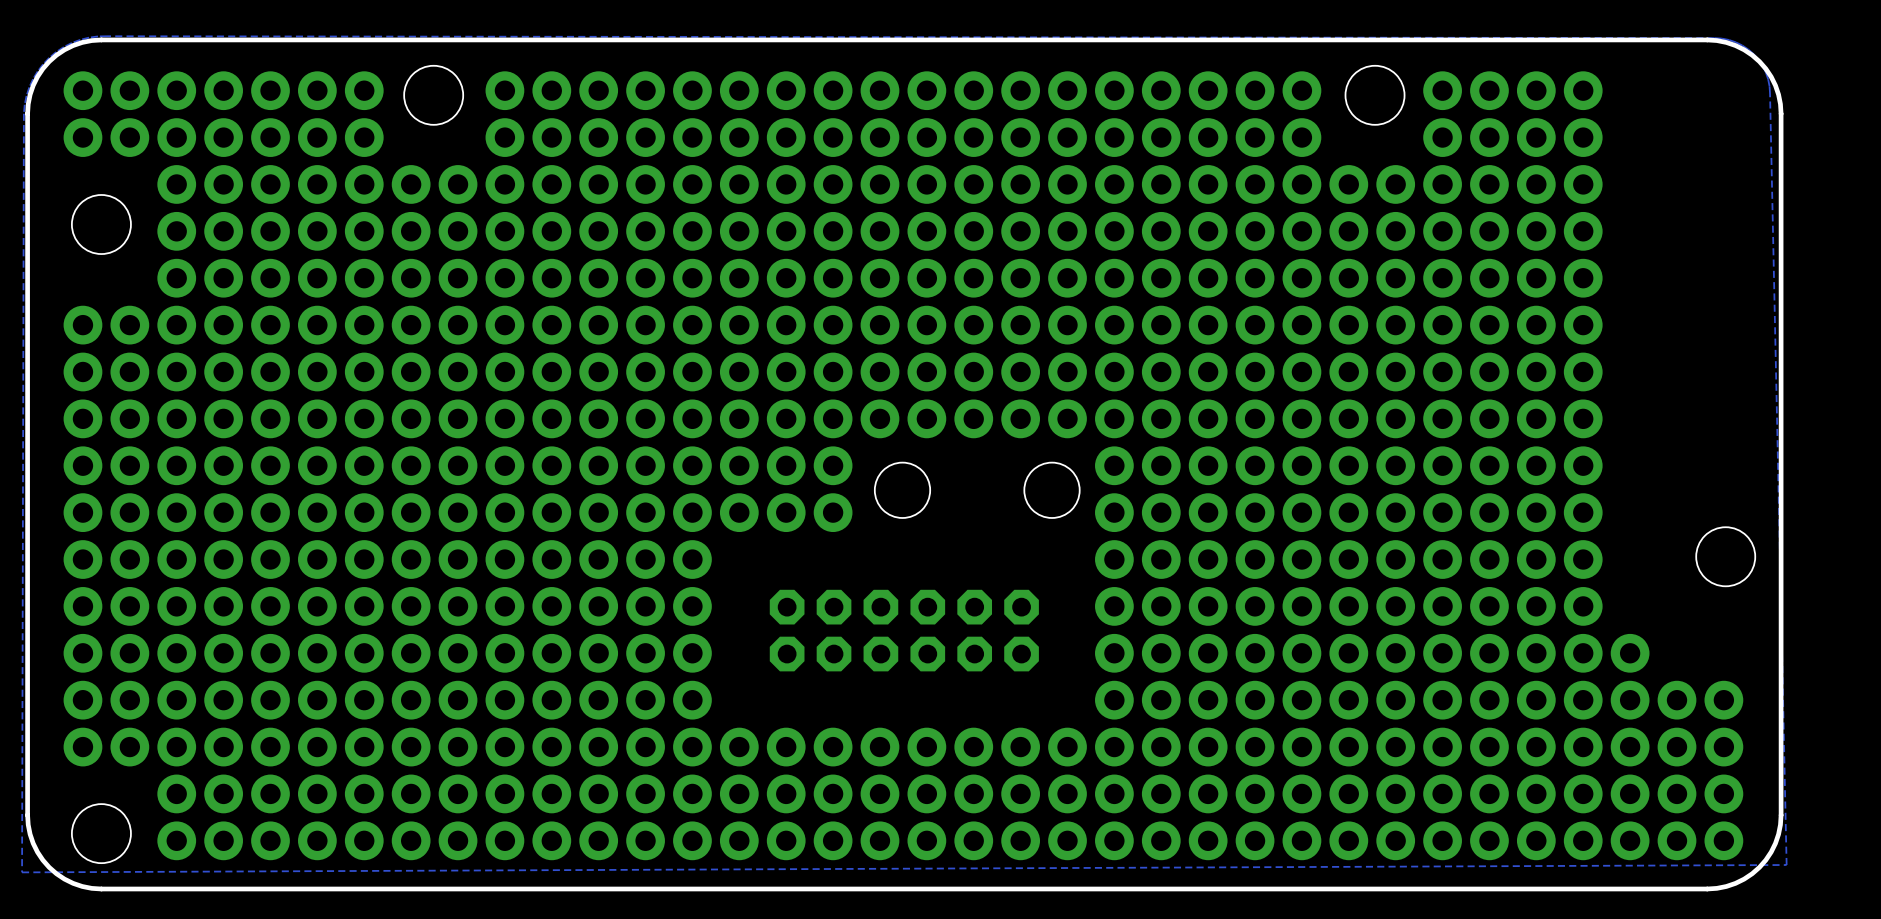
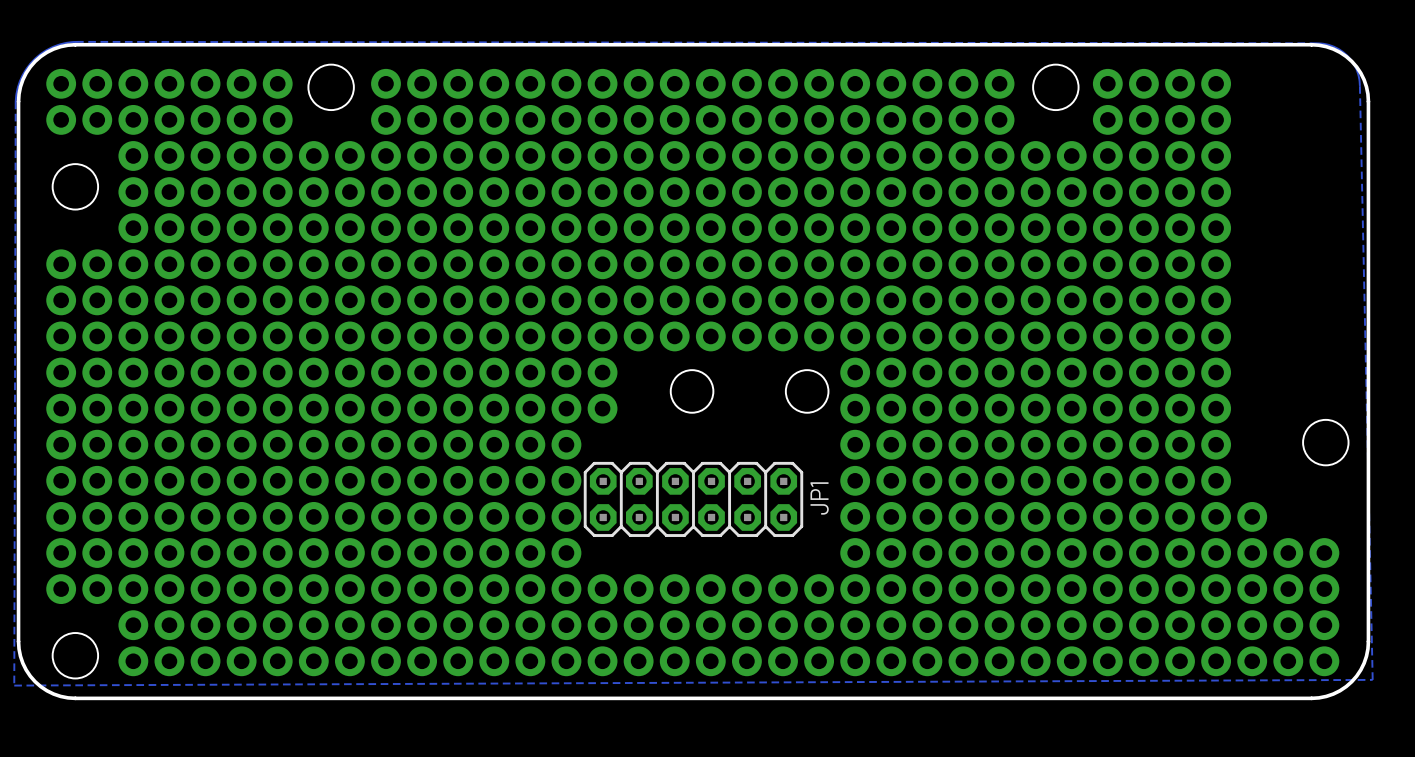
via: (833, 465) -> none
via: (833, 512) -> none
via: none -> (566, 444)
via: none -> (566, 480)
JP1 side: top (904, 630) -> bottom (693, 499)
via: none -> (566, 516)
via: none -> (566, 553)

